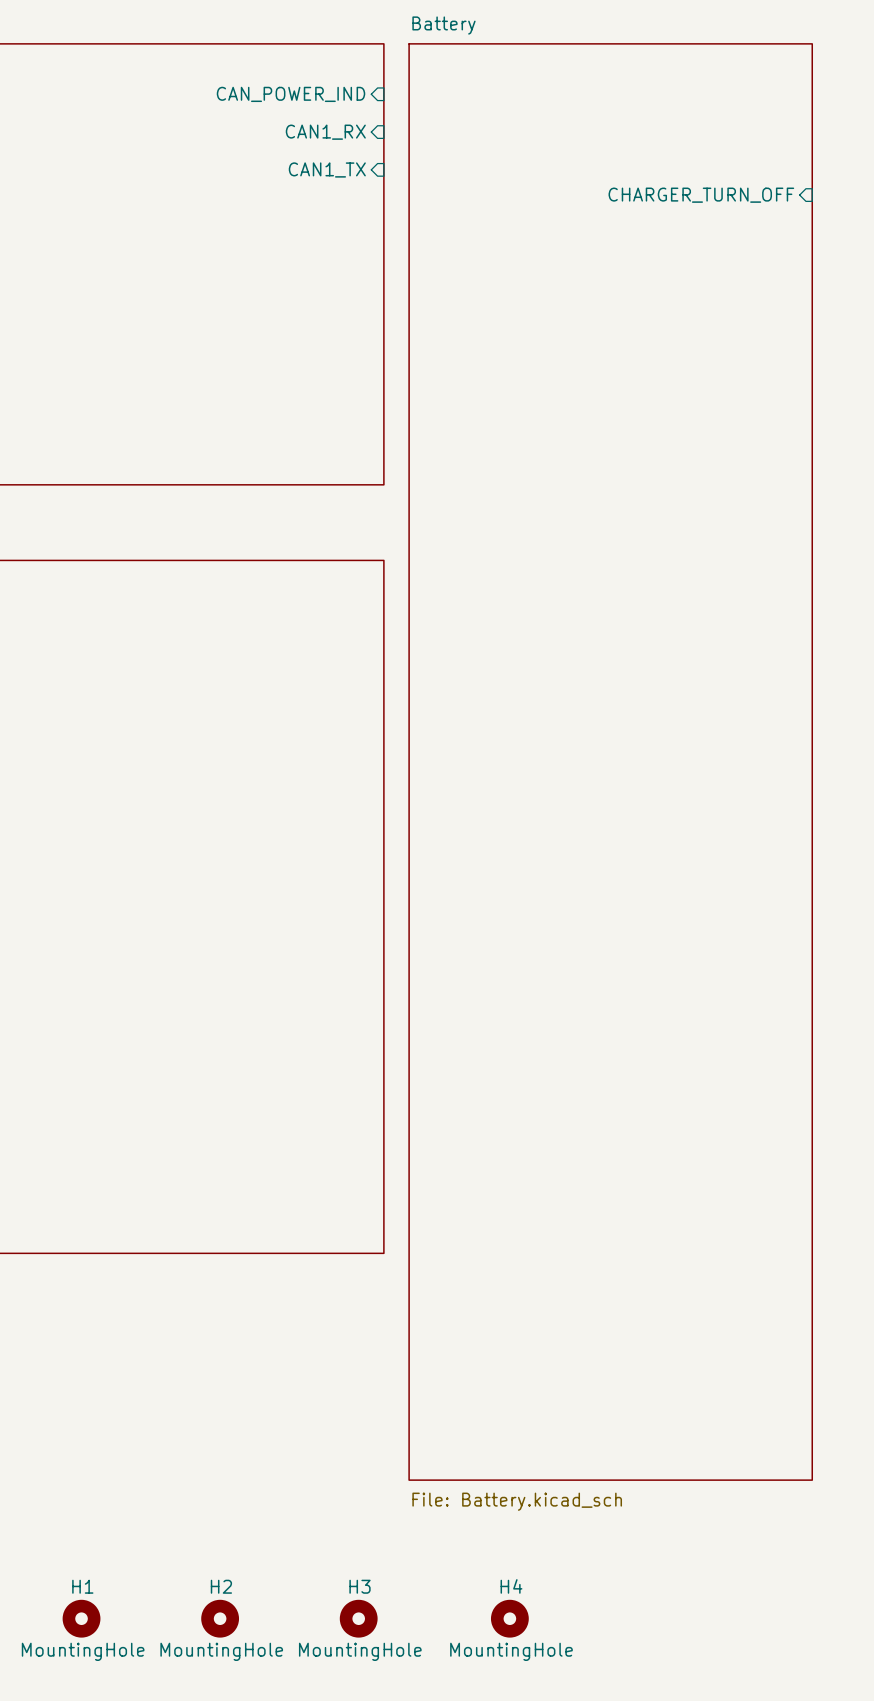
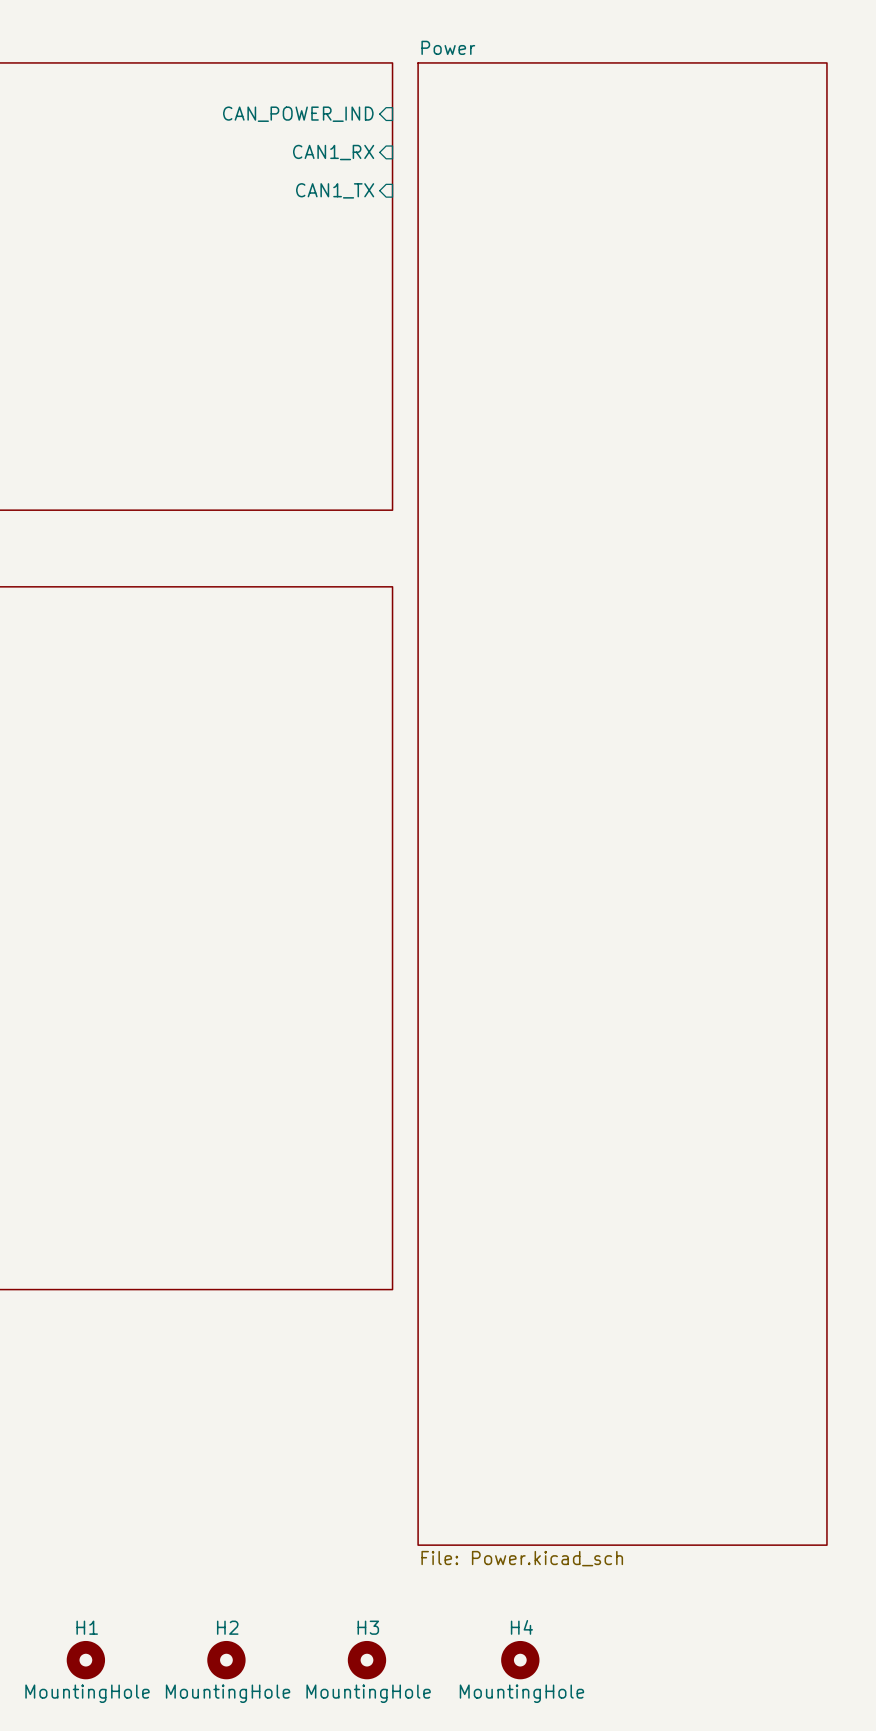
sheet pin: CHARGER_TURN_OFF (701, 195) -> none
sheet Battery: File: Battery.kicad_sch (610, 762) -> none
sheet Power: none -> File: Power.kicad_sch (622, 804)

